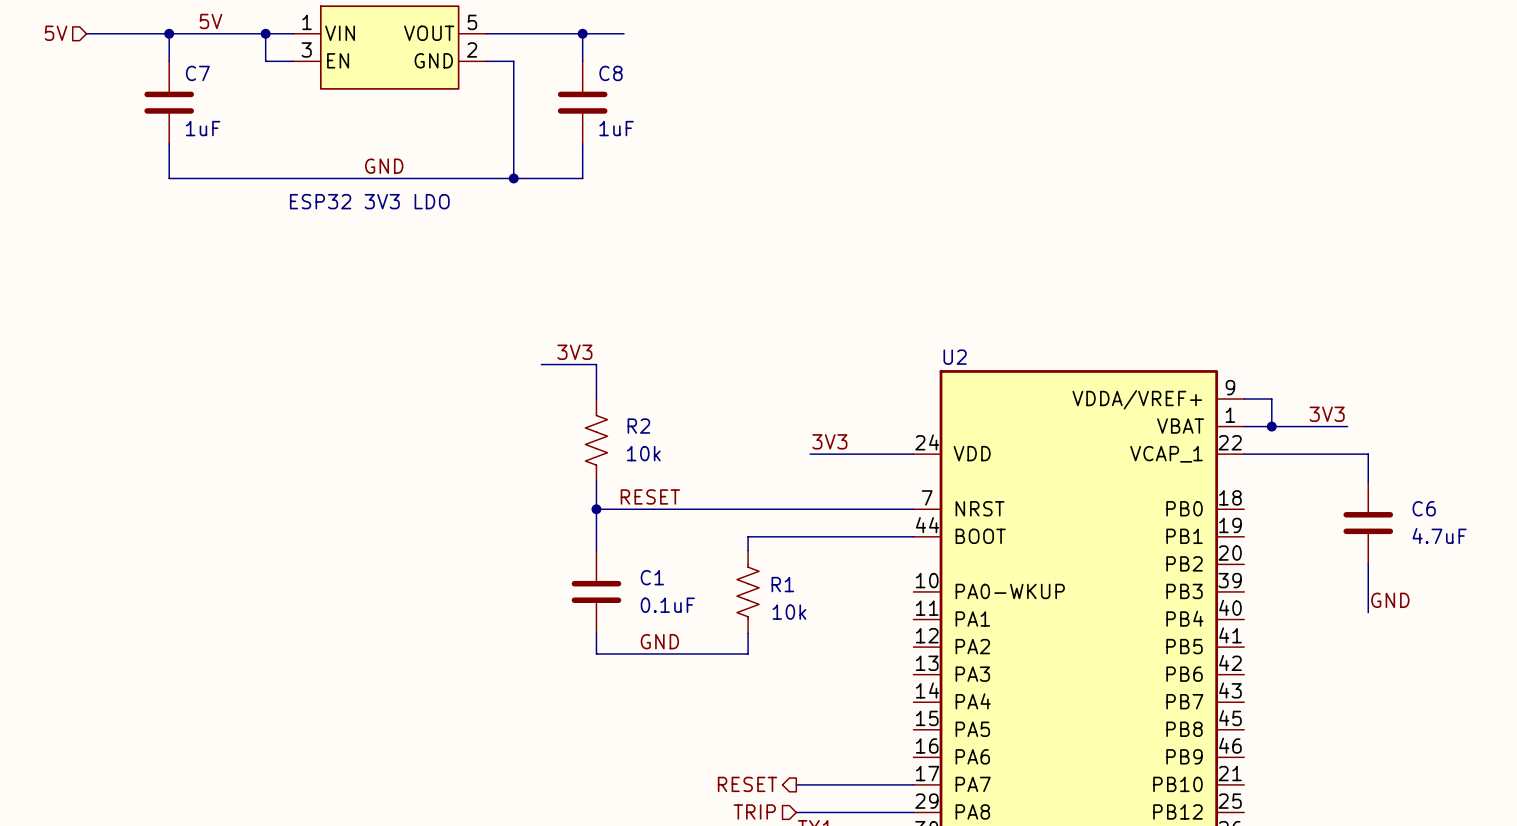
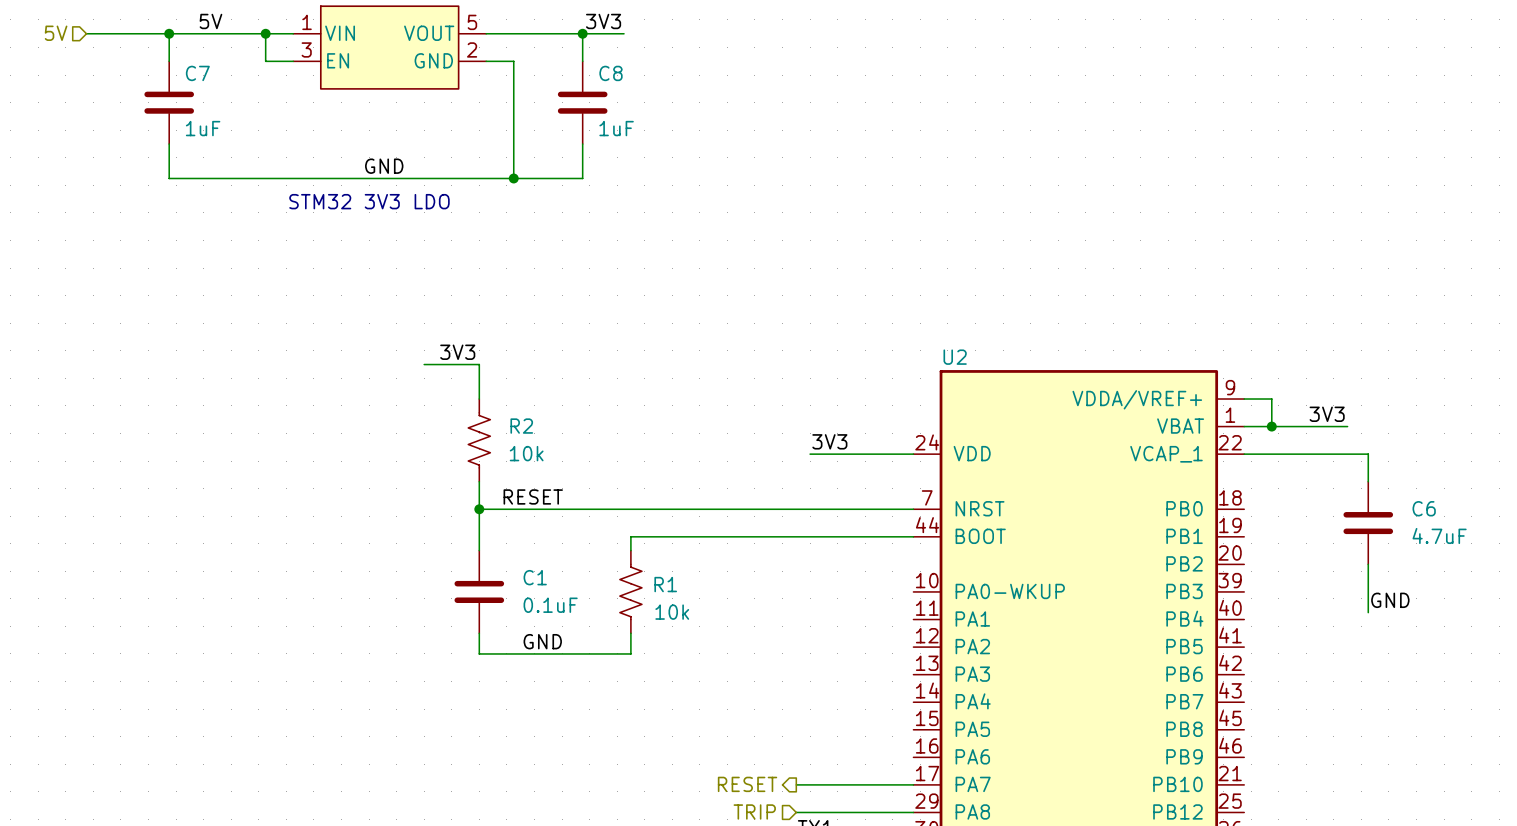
label: none -> 3V3 (603, 21)
text: ESP32 3V3 LDO (369, 201) -> STM32 3V3 LDO (369, 201)
label position: 3V3 (574, 352) -> 3V3 (457, 352)
wire: (541, 364) (596, 364) (596, 399) -> (424, 364) (479, 364) (479, 399)
R2 position: (596, 440) -> (479, 440)
wire: (596, 481) (596, 550) -> (479, 481) (479, 550)
label position: RESET (650, 496) -> RESET (533, 496)
wire: none -> (479, 509) (596, 509)
junction: none -> (479, 509)
junction: (596, 509) -> none
wire: (748, 536) (748, 550) -> (748, 536) (630, 536) (630, 550)
C1 position: (596, 591) -> (479, 591)
R1 position: (748, 591) -> (630, 591)
wire: (596, 633) (596, 653) -> (479, 633) (479, 653) (596, 653)
wire: (748, 633) (748, 653) (630, 653) -> (630, 633) (630, 653)
label position: GND (659, 641) -> GND (542, 641)

